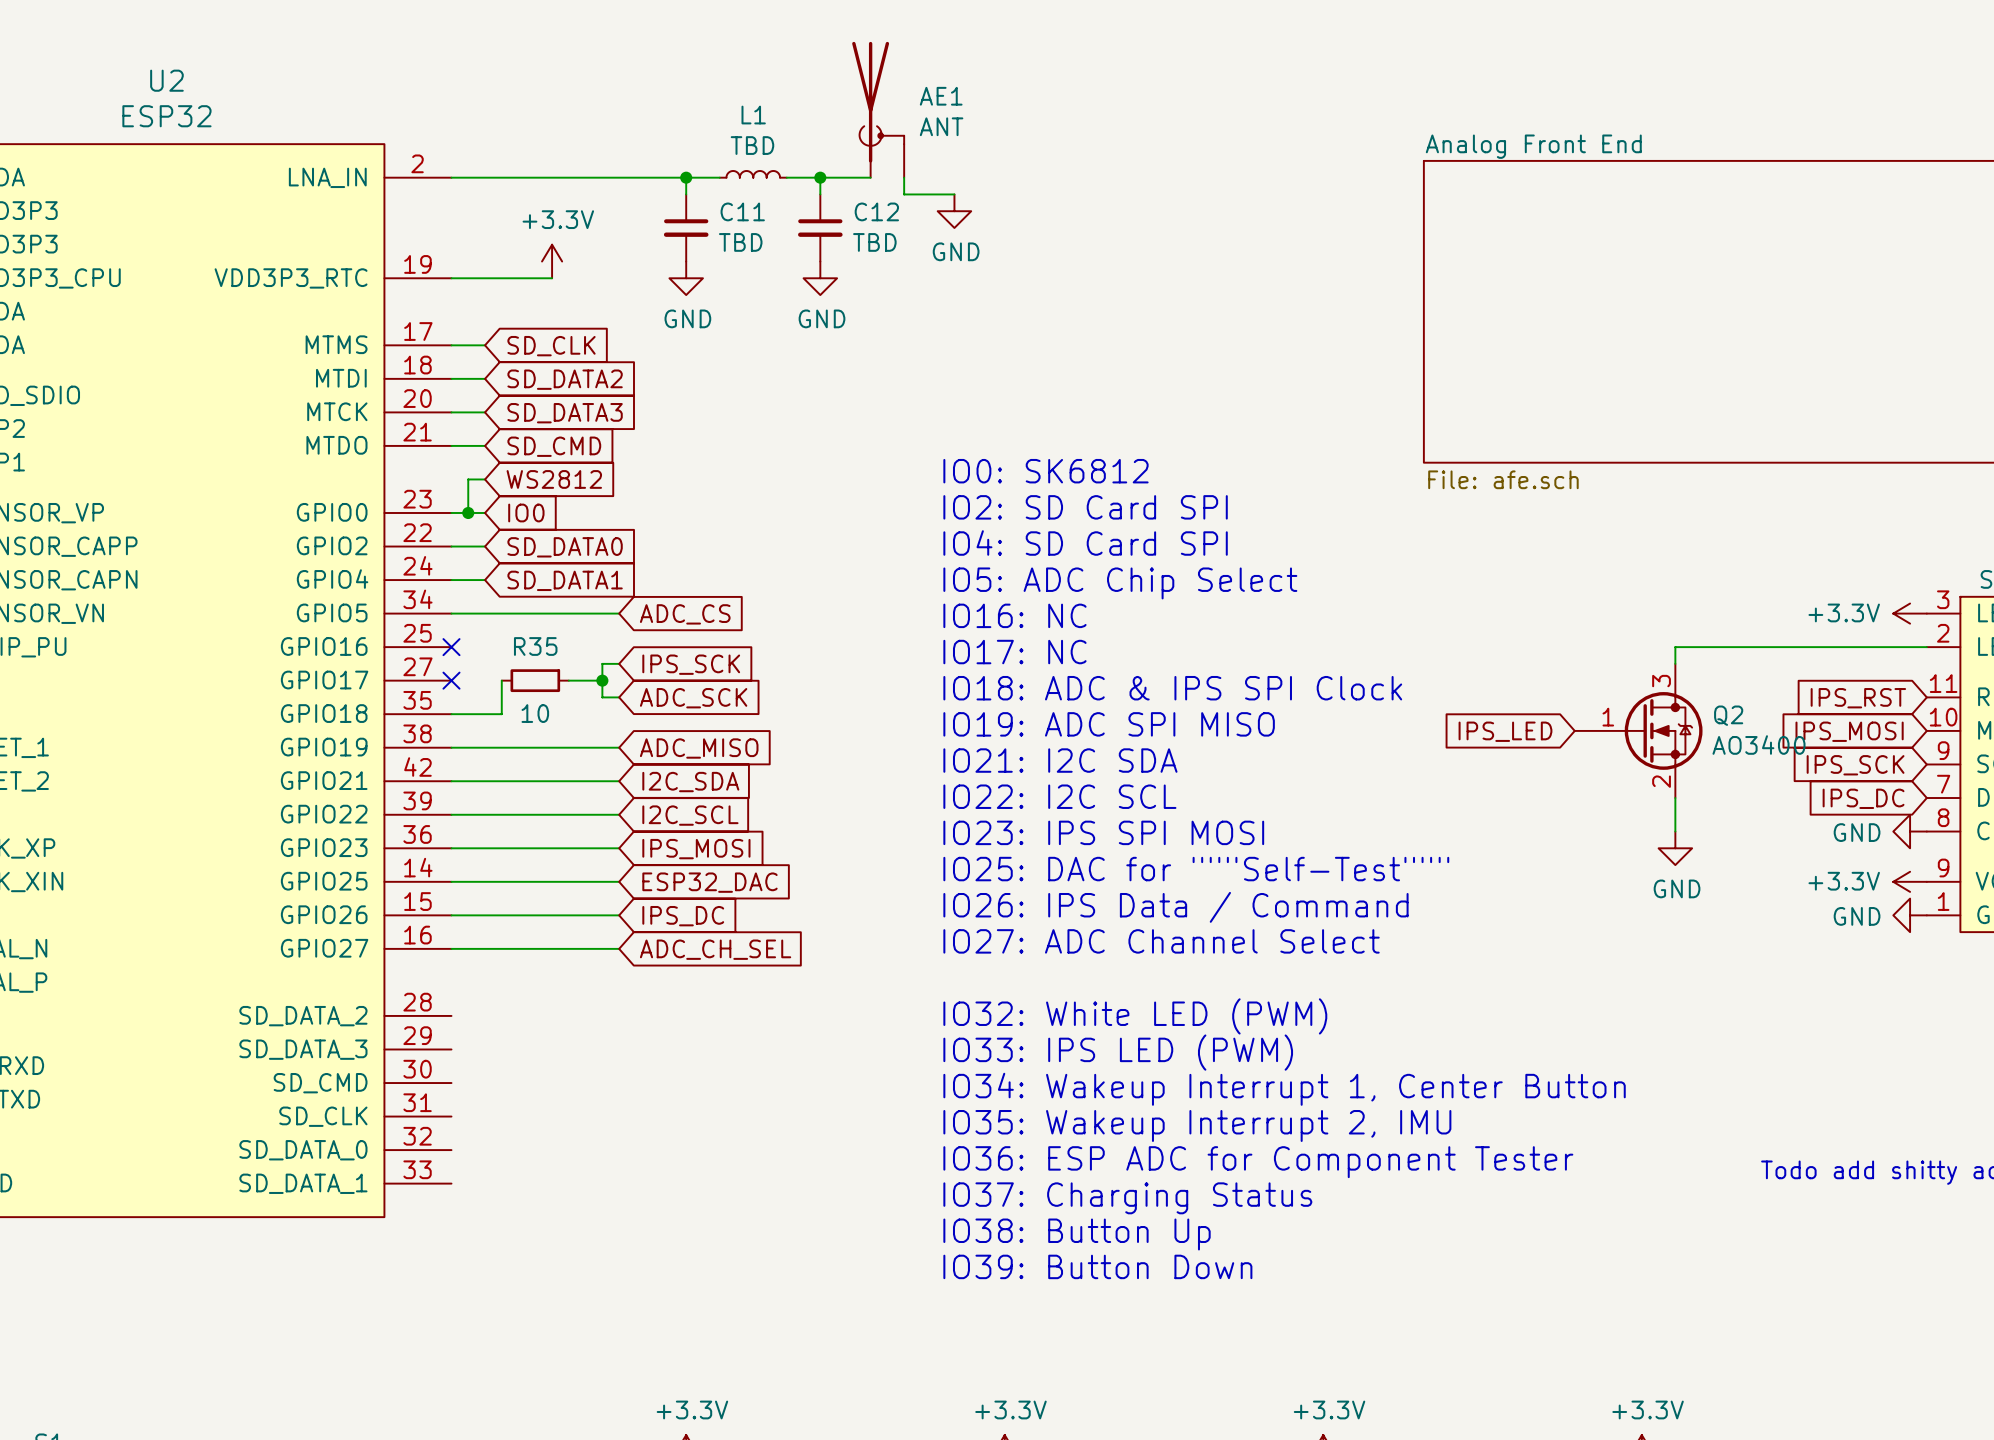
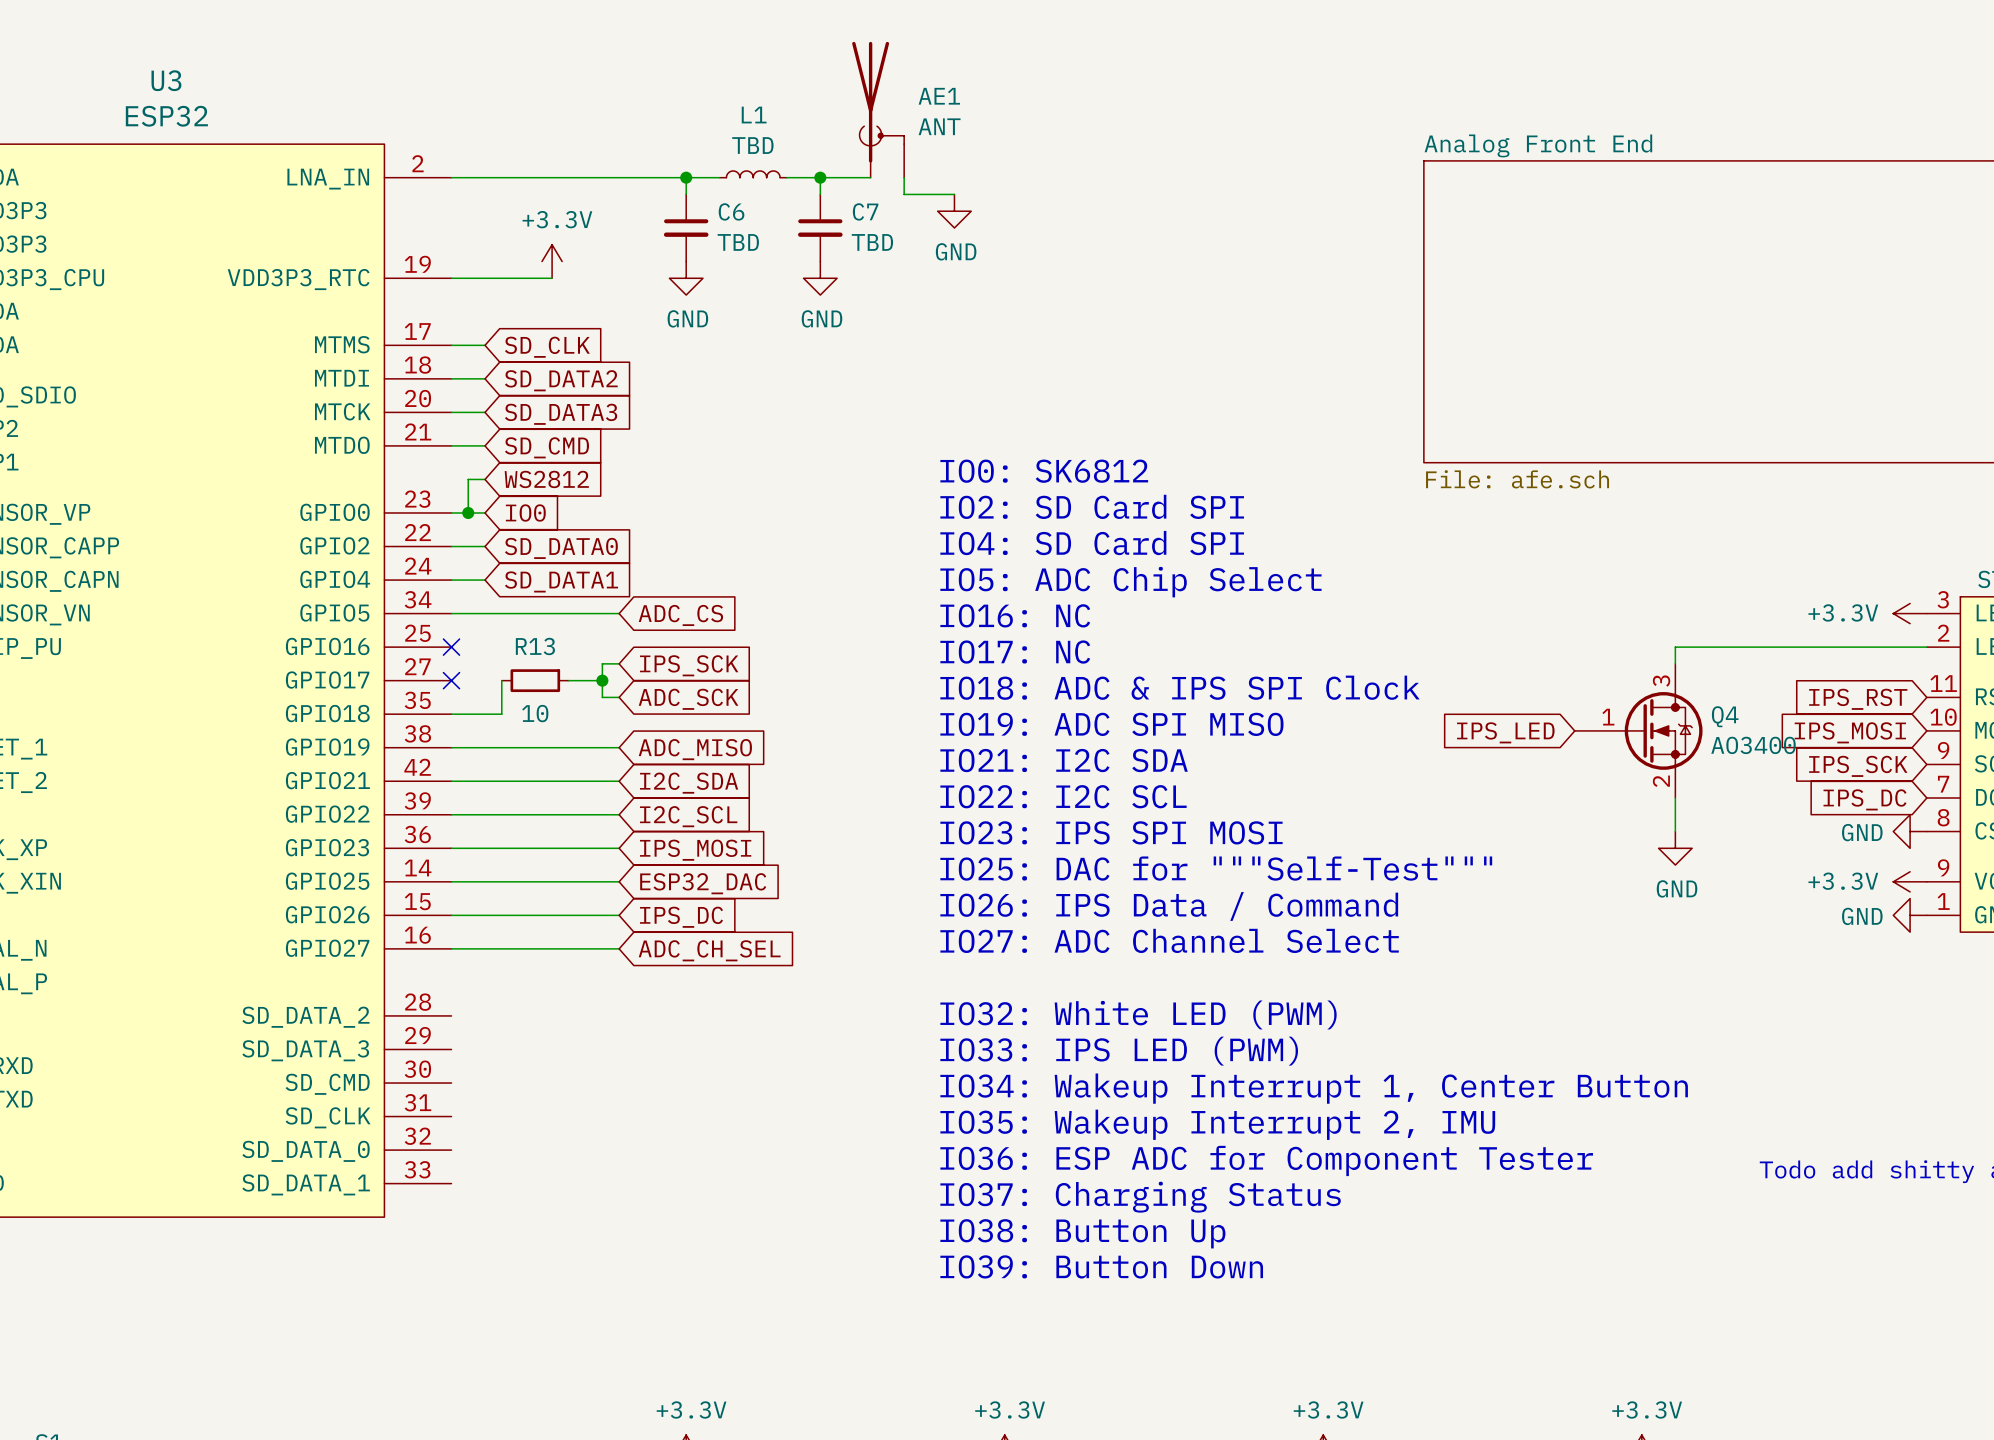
U2 name: U2 (166, 80) -> U3 (166, 80)
C11 name: C11 (742, 211) -> C6 (731, 211)
C12 name: C12 (876, 211) -> C7 (865, 211)
R35 name: R35 (535, 646) -> R13 (535, 646)
Q2 name: Q2 (1728, 715) -> Q4 (1725, 716)

